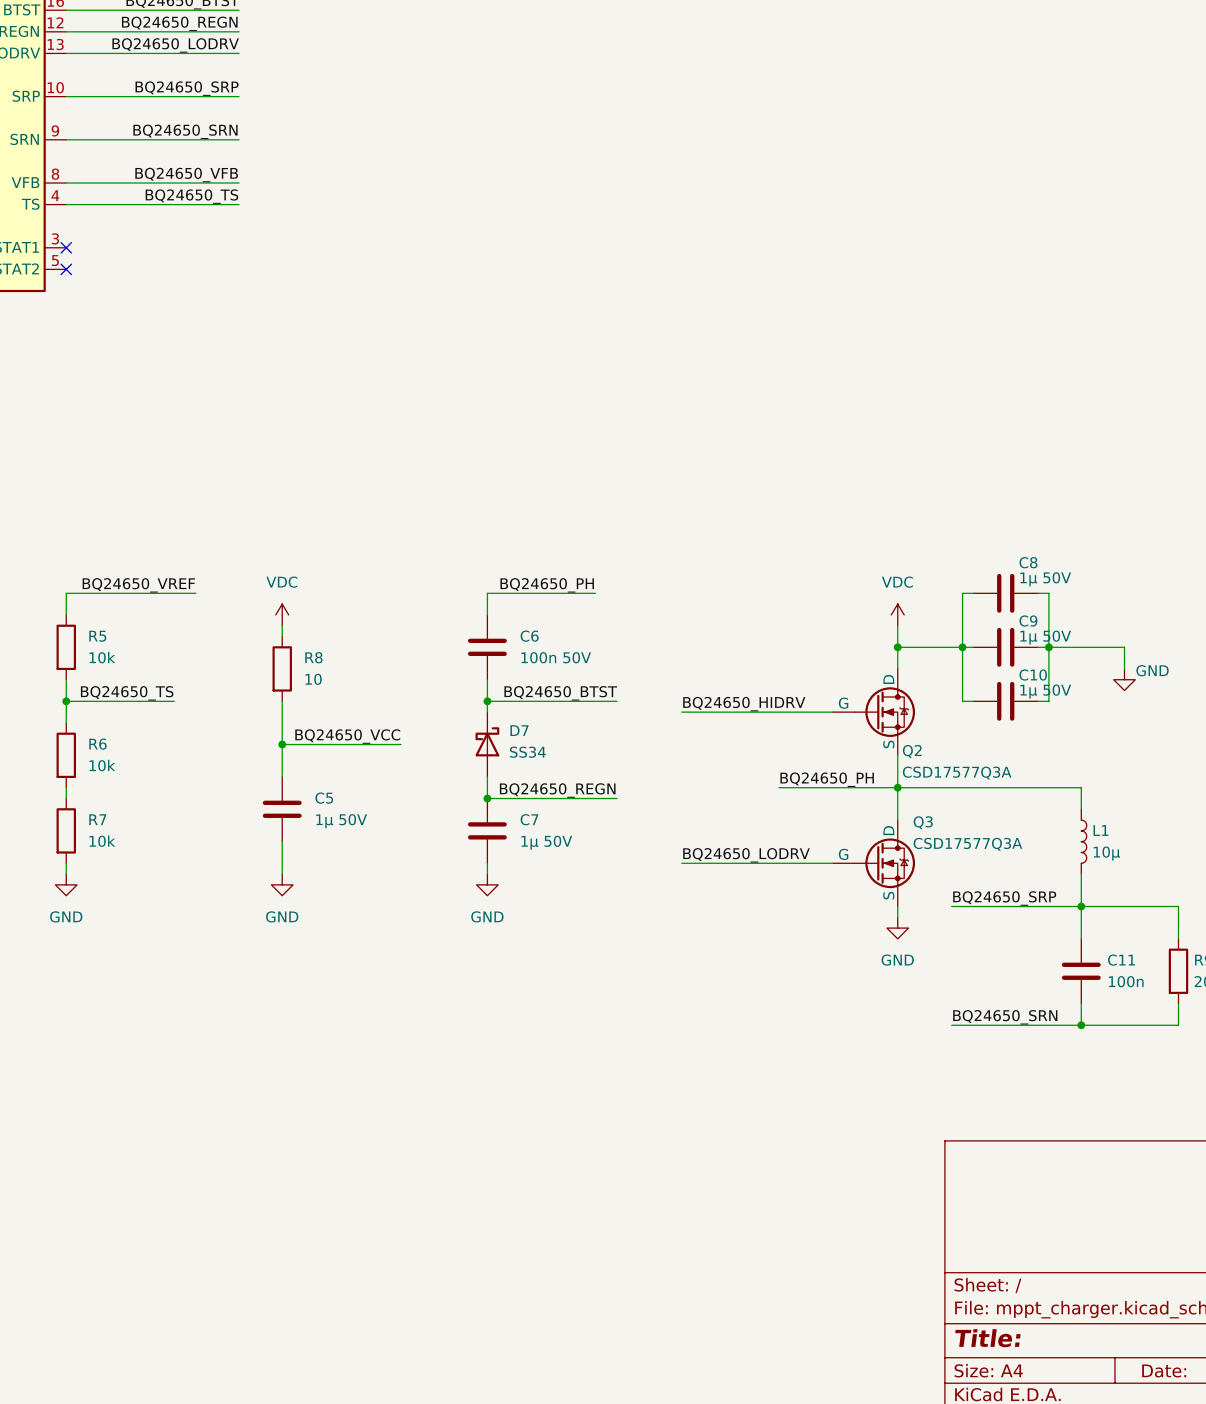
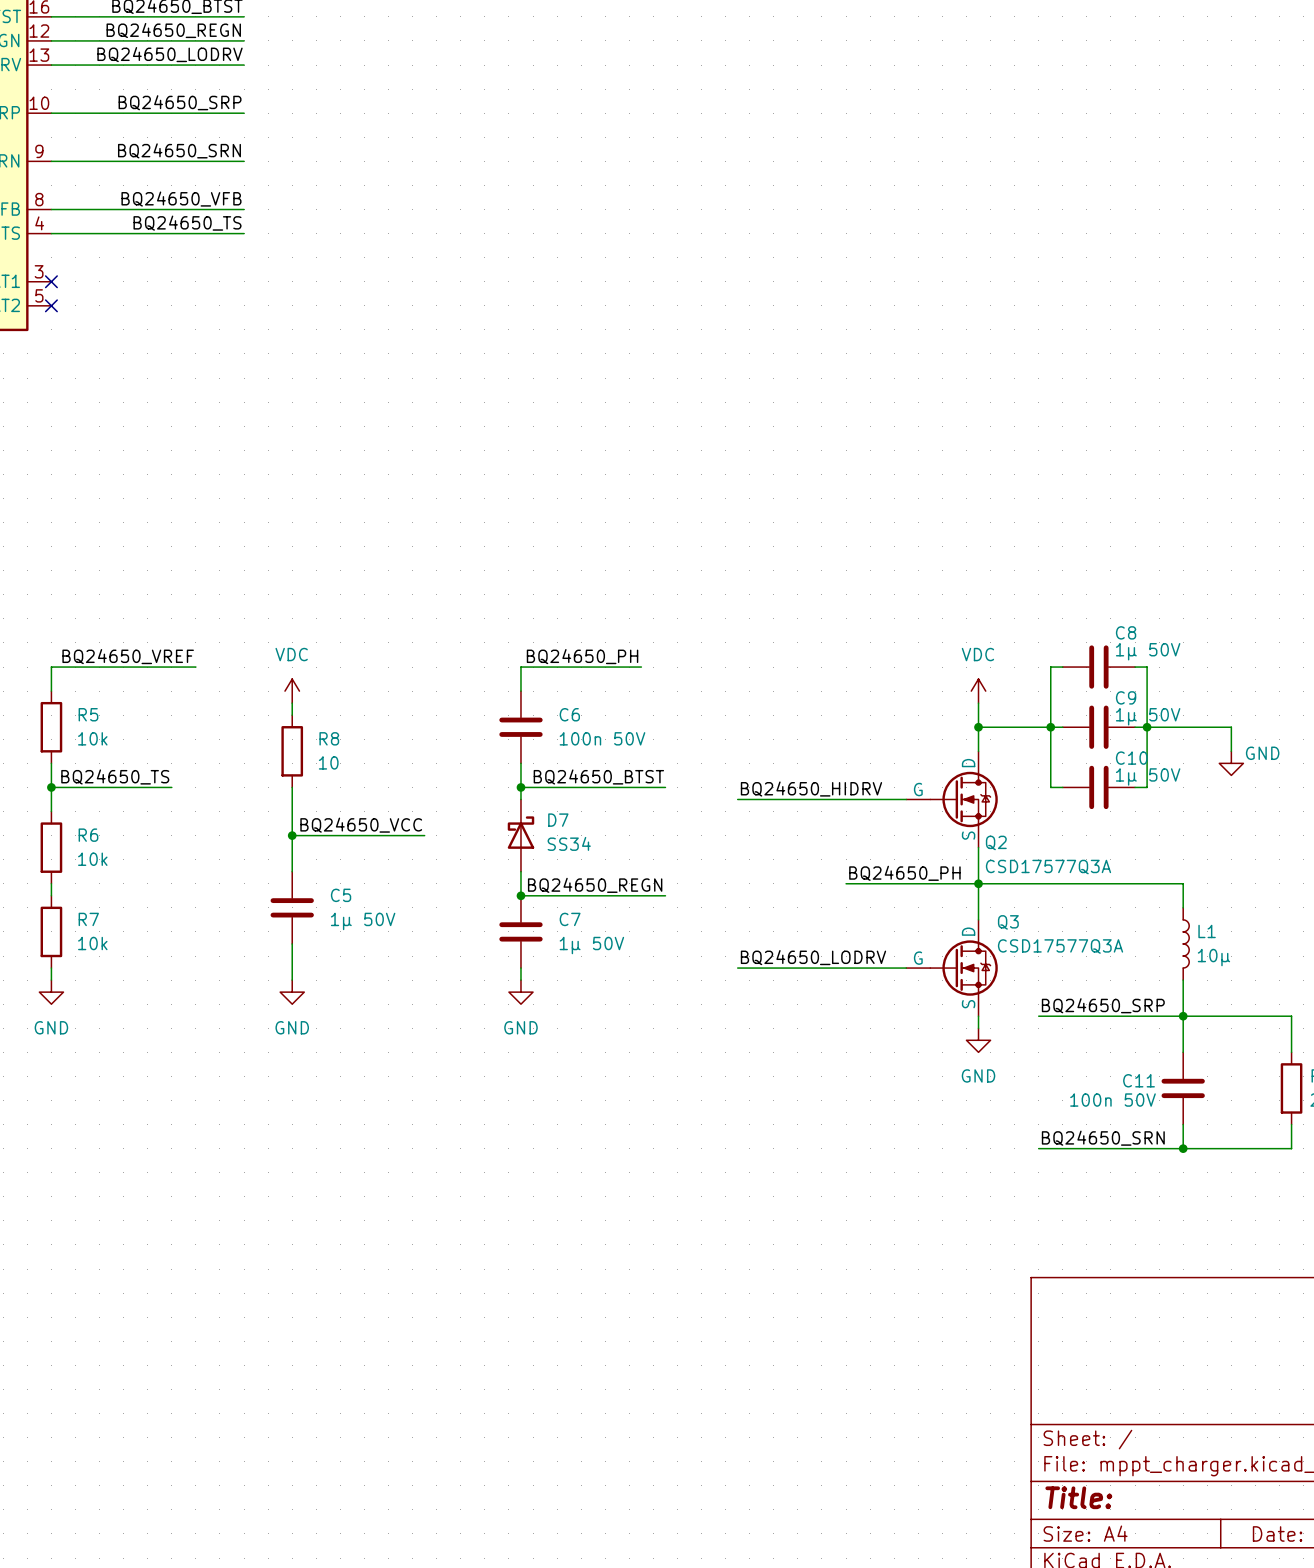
C11 name position: C11 (1121, 960) -> C11 (1139, 1080)
C11 value: 100n (1126, 981) -> 100n 50V (1112, 1100)

